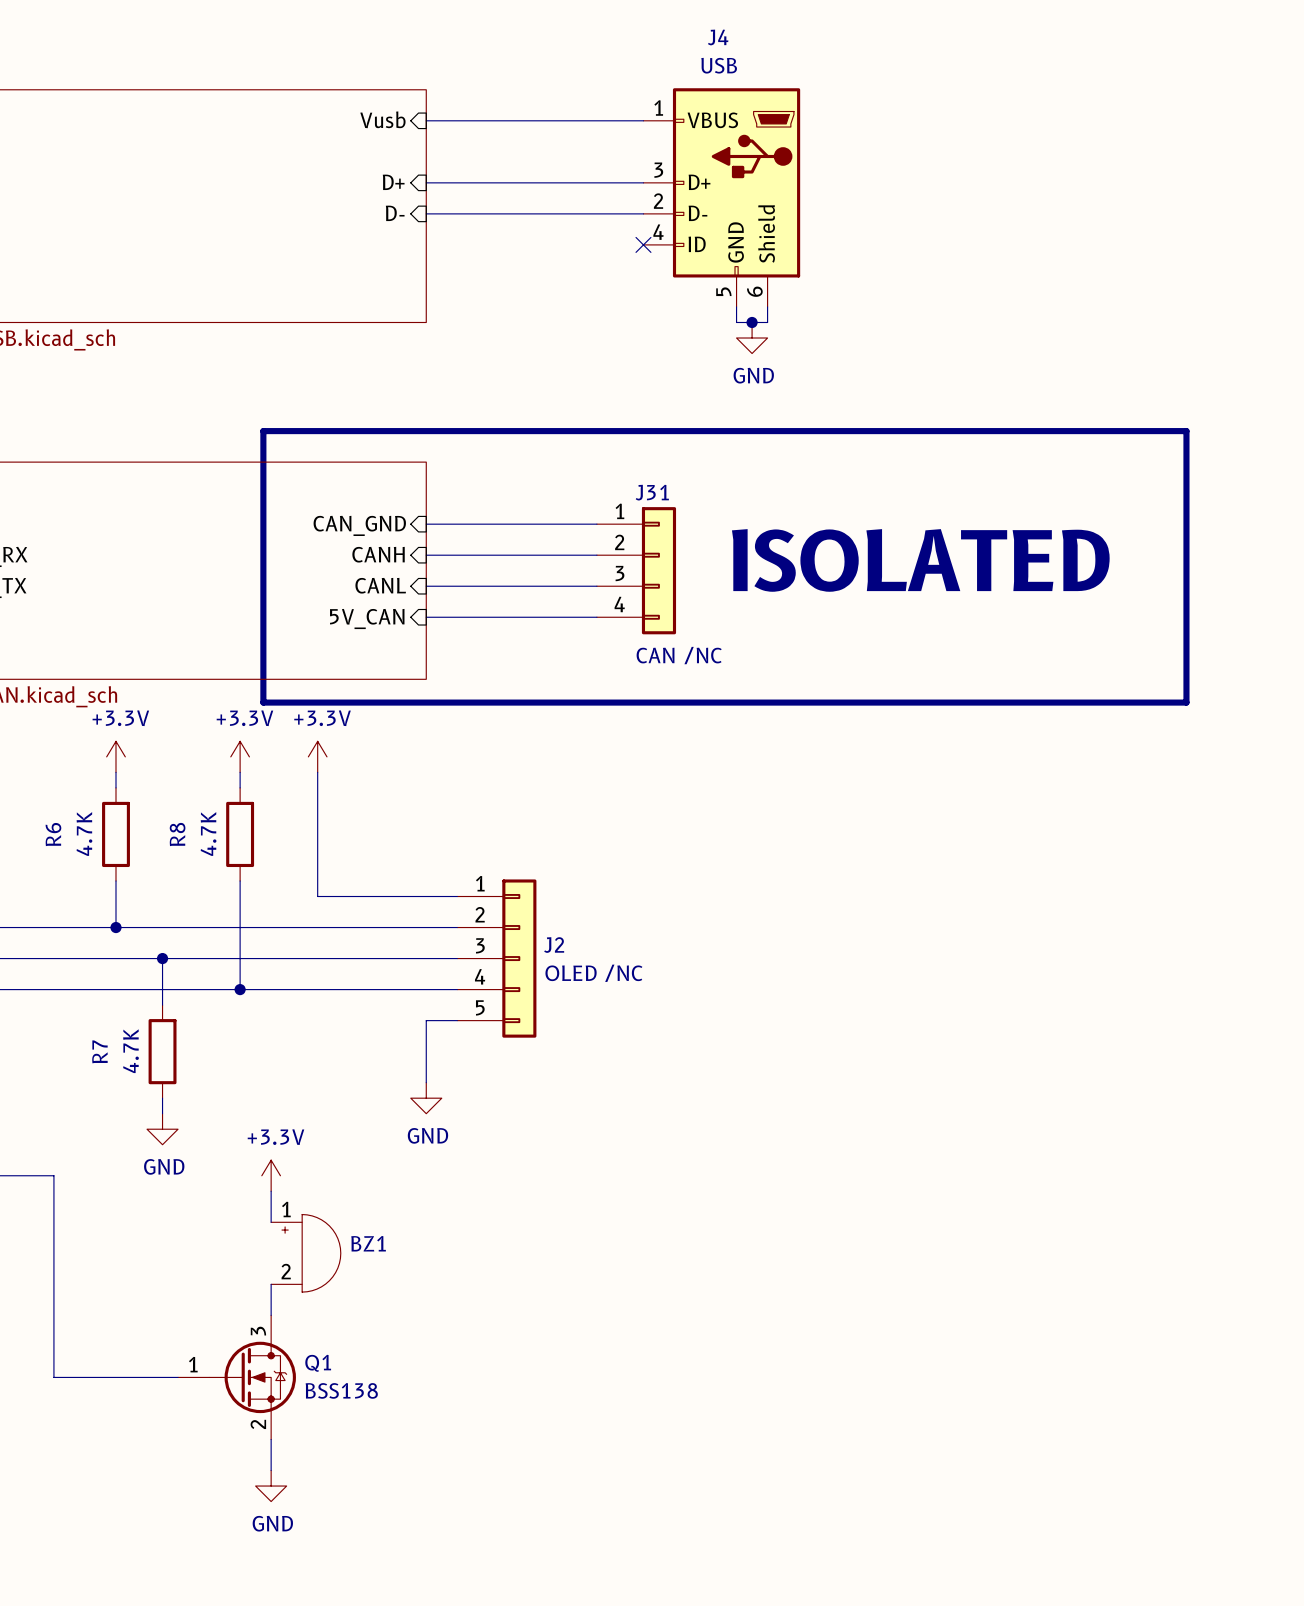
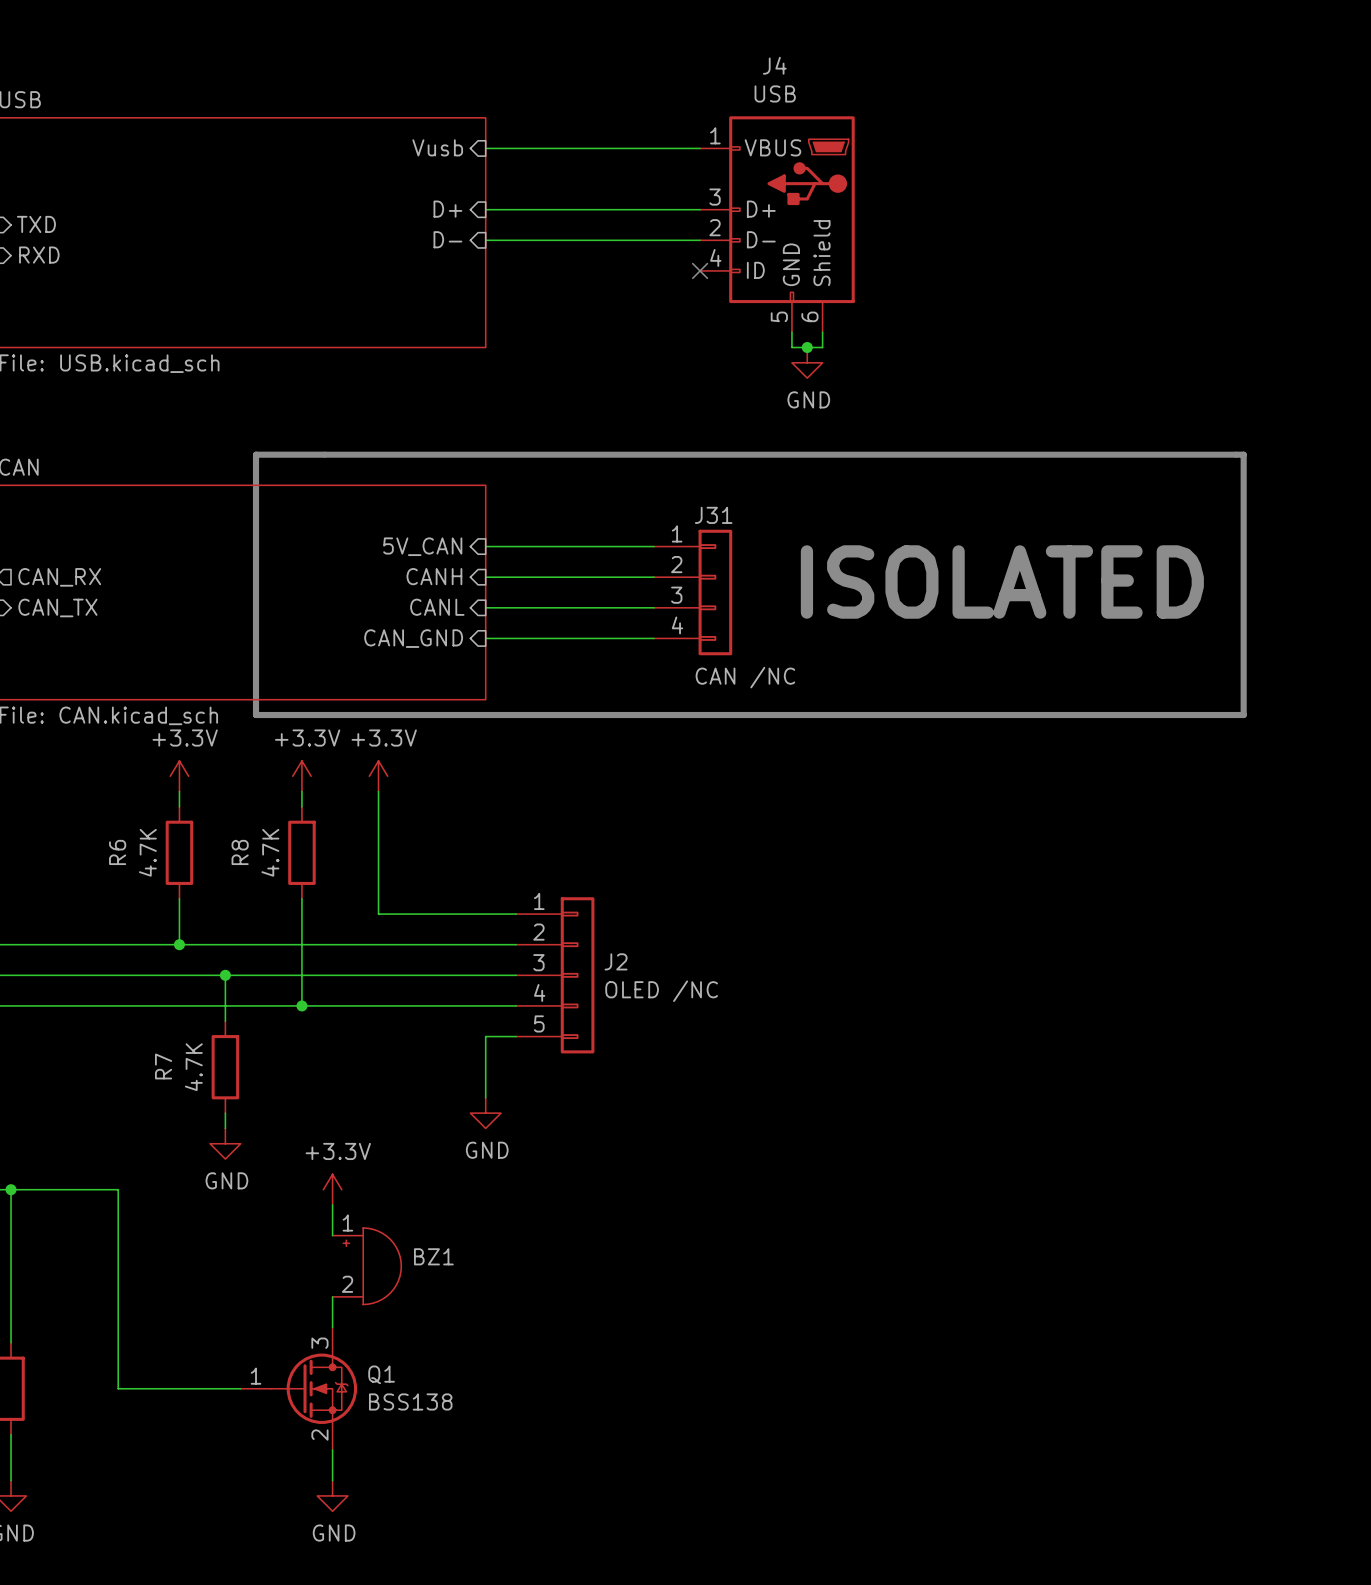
line: (263, 431) (263, 702) (1186, 702) (1186, 431) -> (324, 454) (256, 454) (256, 715) (1243, 715) (1243, 454) (1236, 454)
sheet pin: CAN_GND (359, 525) -> 5V_CAN (422, 546)
sheet pin: 5V_CAN (367, 618) -> CAN_GND (413, 638)

